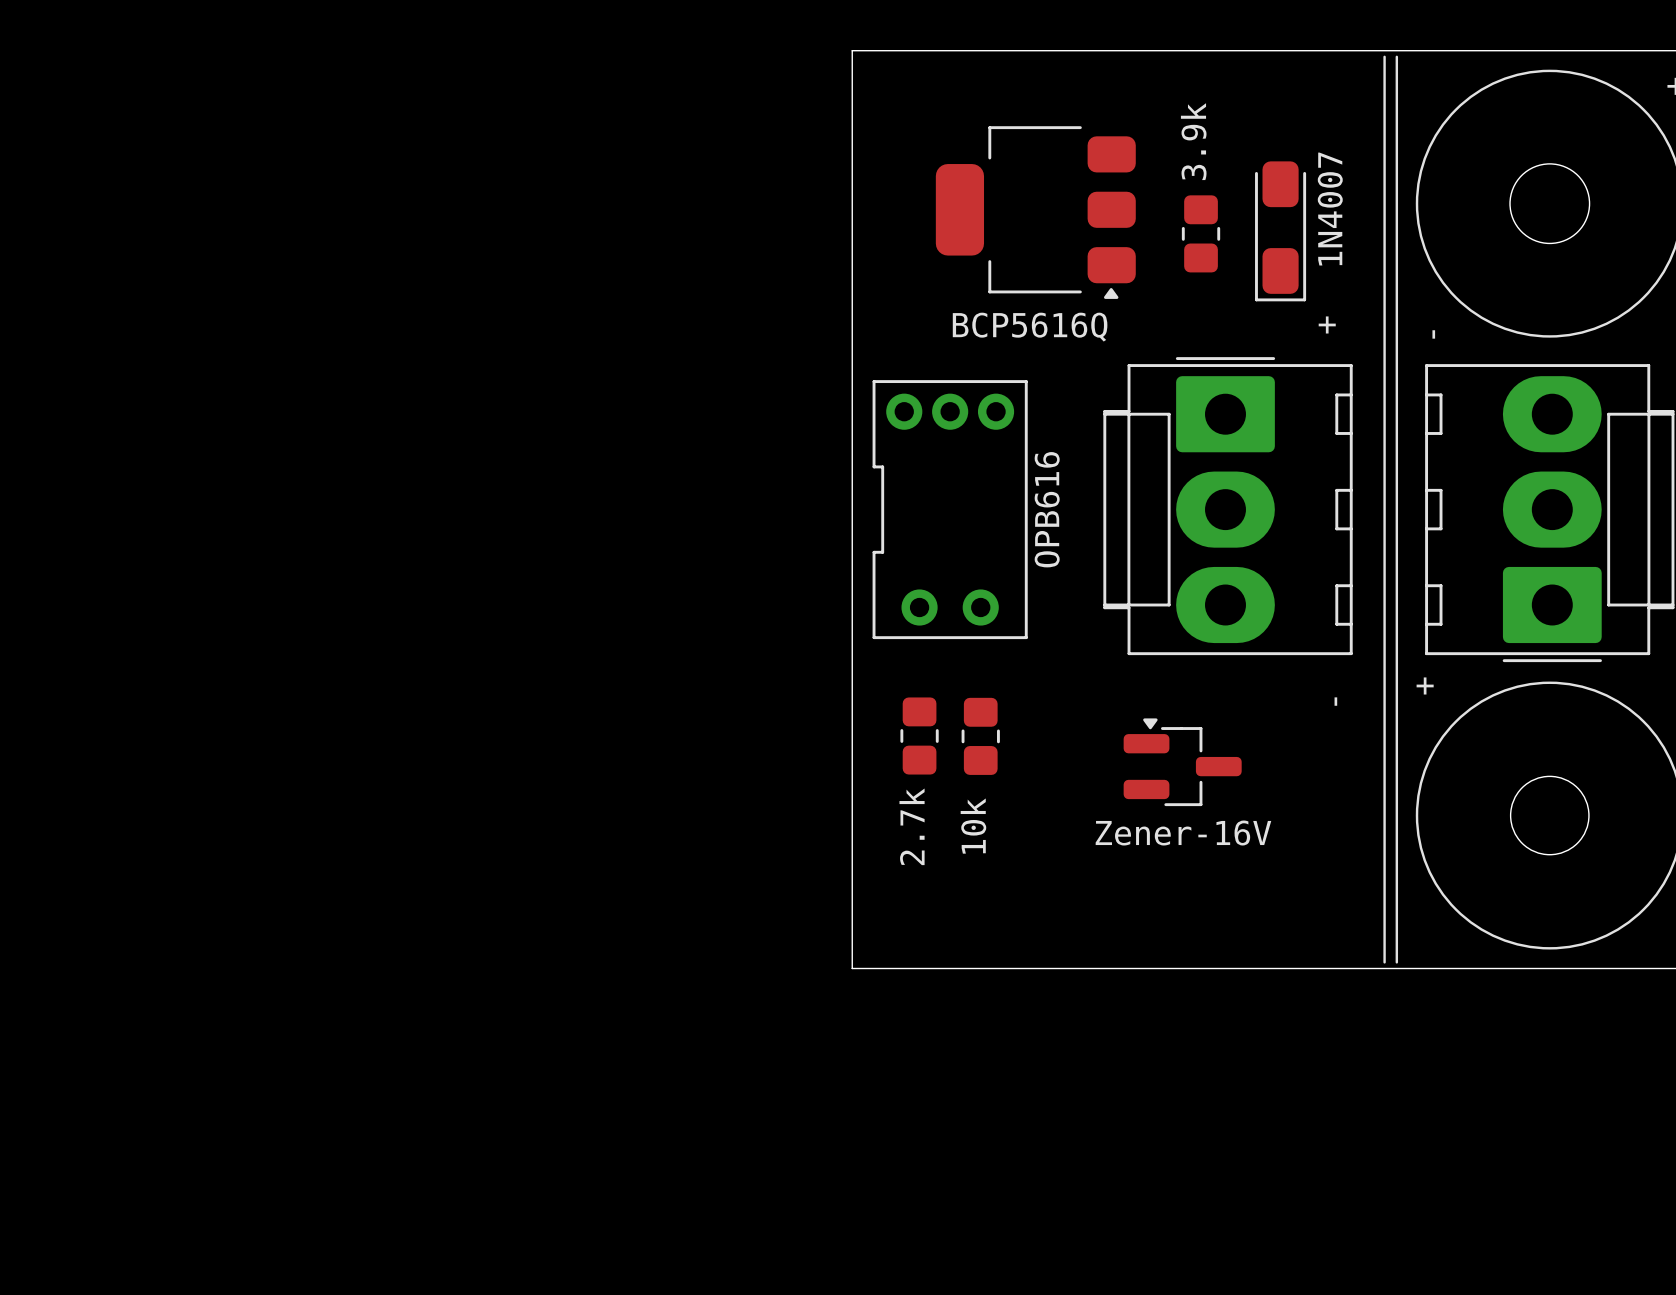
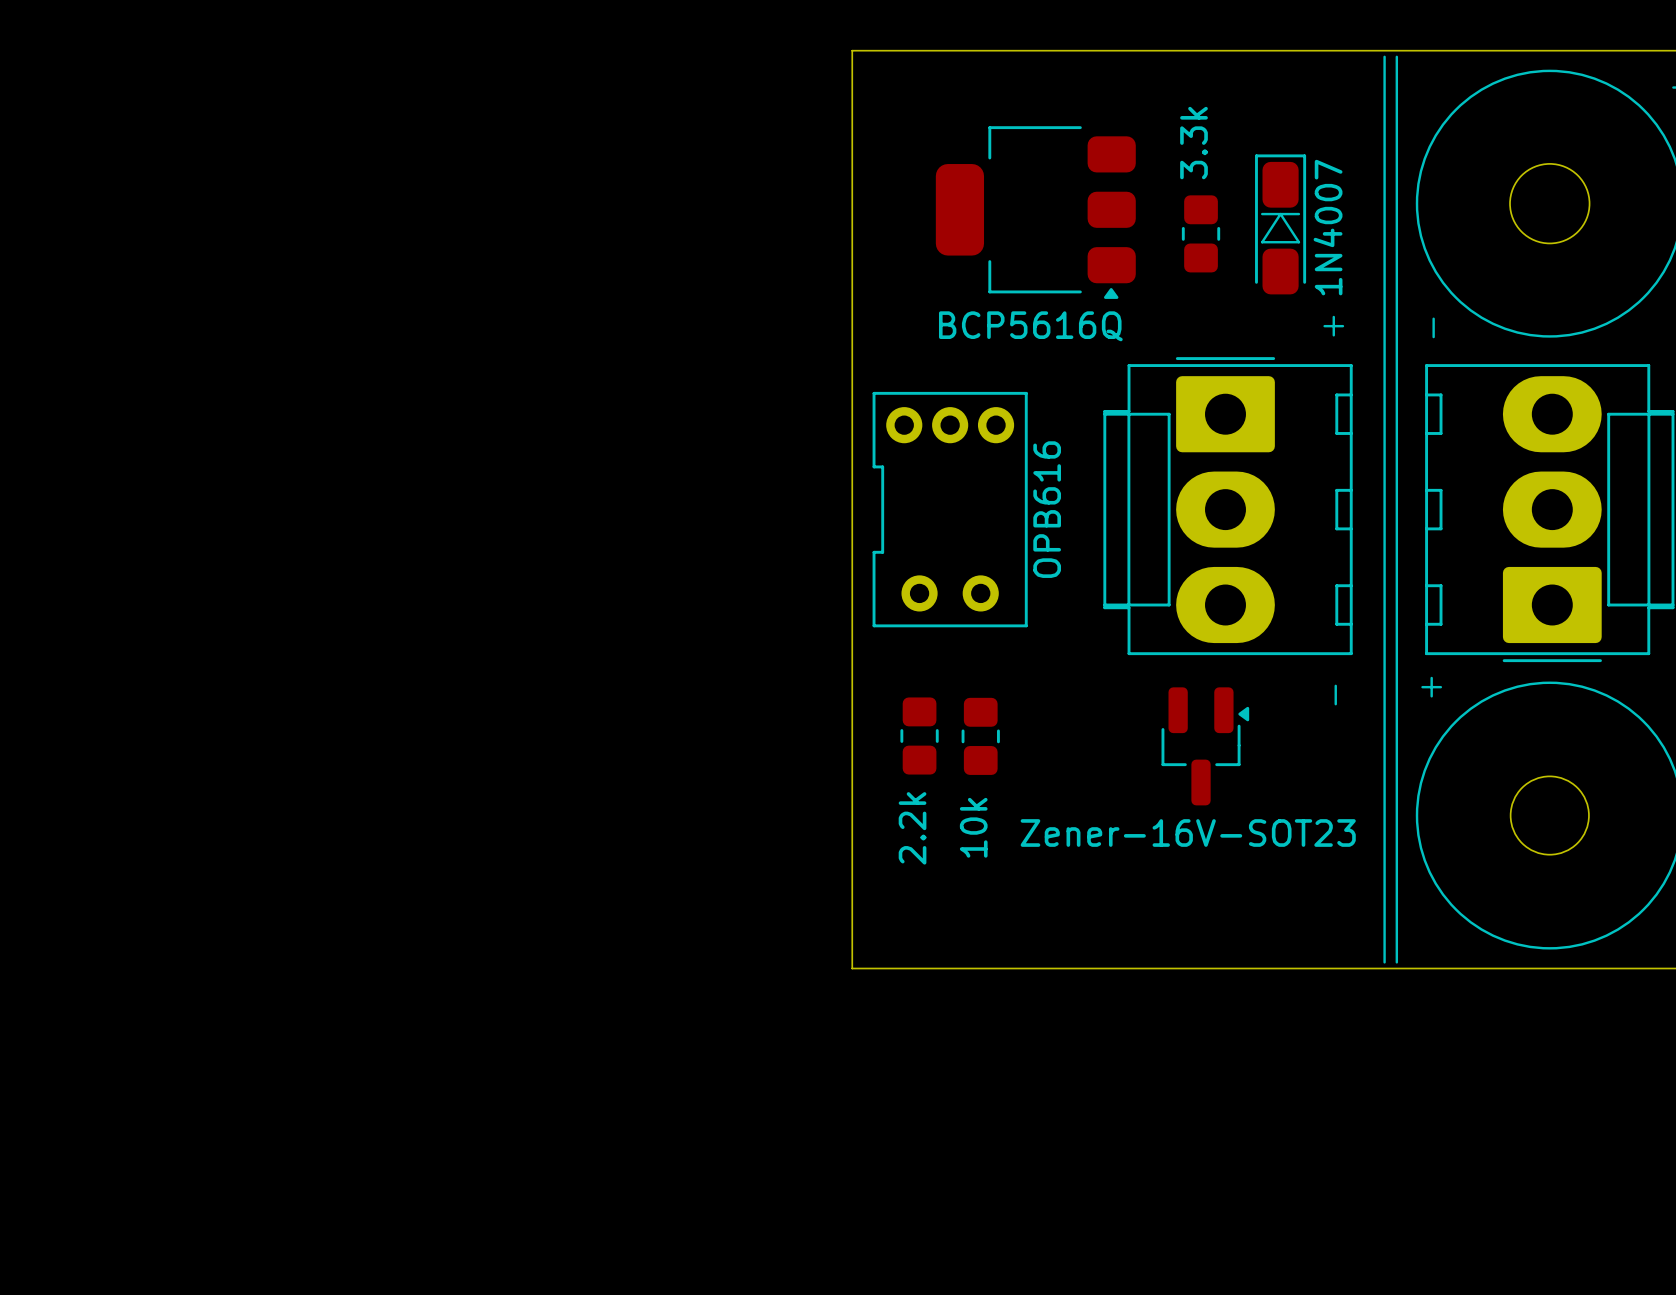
part value: 3.9k (1193, 141) -> 3.3k (1194, 143)
part footprint: [1255, 161, 1307, 302] -> [1255, 154, 1307, 295]
part footprint: [872, 380, 1028, 640] -> [872, 391, 1028, 628]
part: none -> Zener-16V-SOT23 (1205, 746)
part: Zener-16V (1182, 762) -> none
part value: 2.7k (912, 826) -> 2.2k (912, 828)

